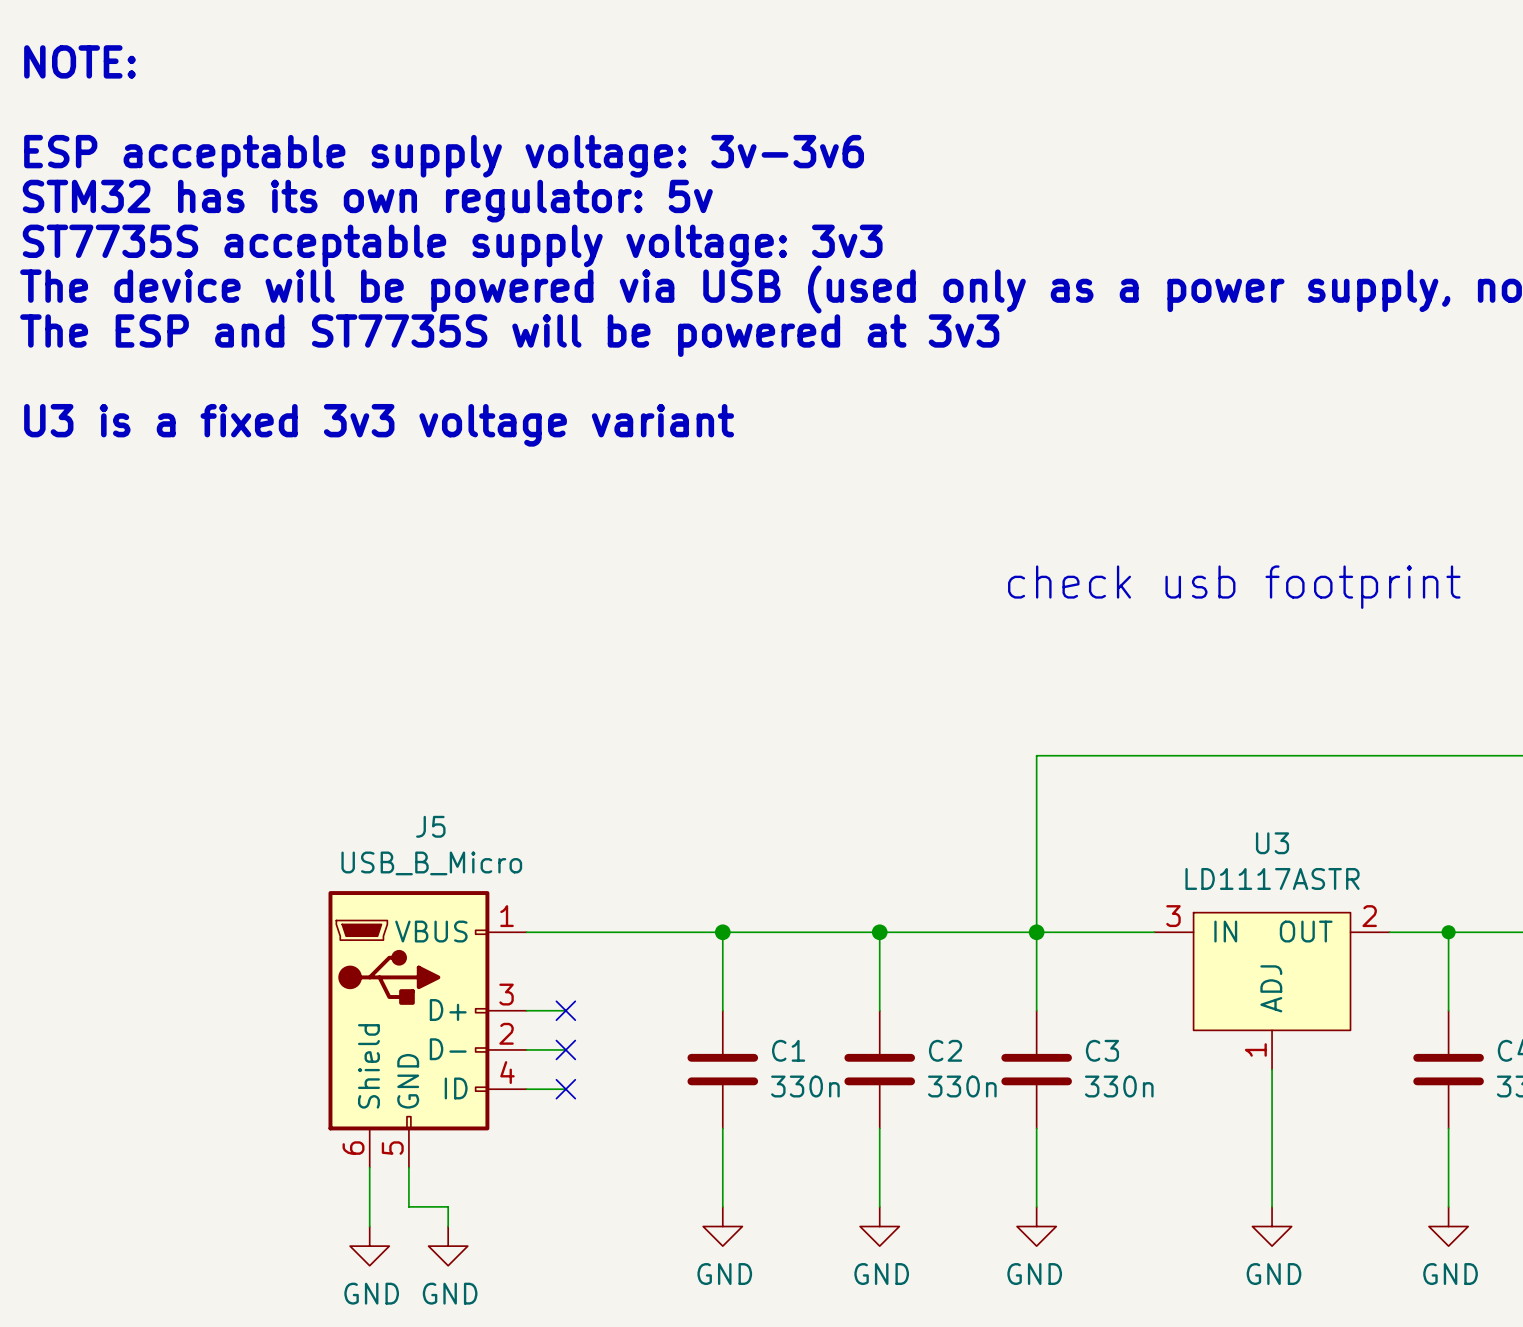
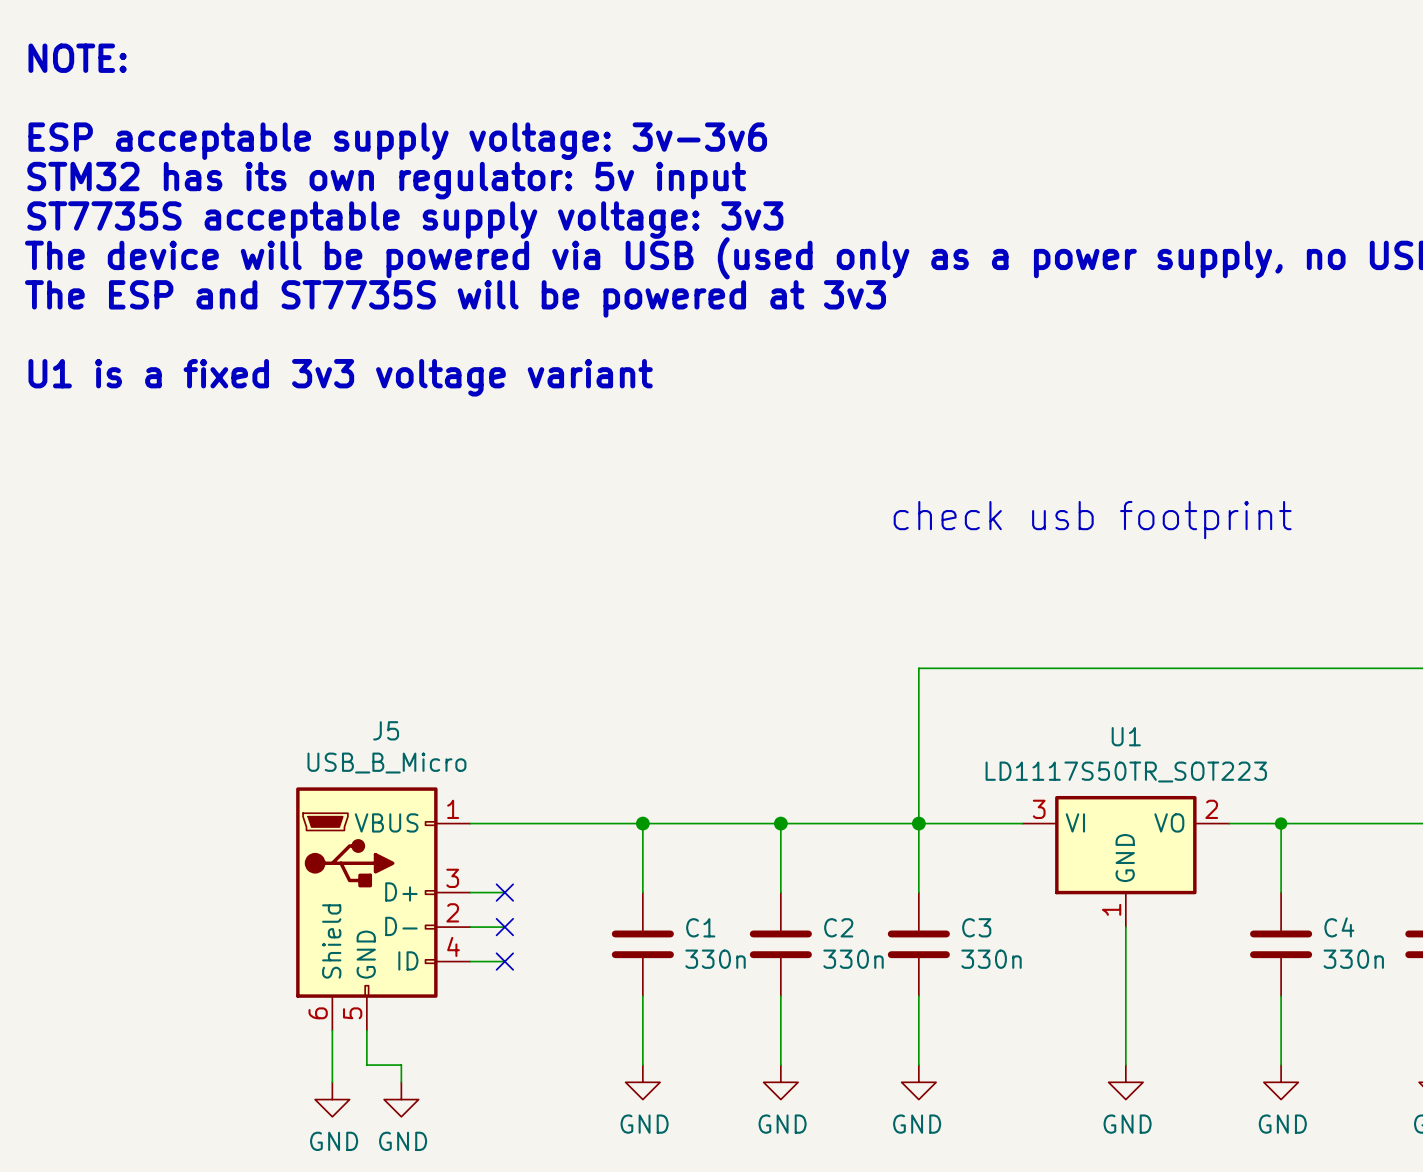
text: STM32 has its own regulator: 5v (367, 201) -> STM32 has its own regulator: 5v input (386, 180)
text: U3 is a fixed 3v3 voltage variant (379, 425) -> U1 is a fixed 3v3 voltage variant (340, 377)
U1: none -> LD1117S50TR_SOT223 (1125, 861)
U3: LD1117ASTR (1272, 991) -> none

